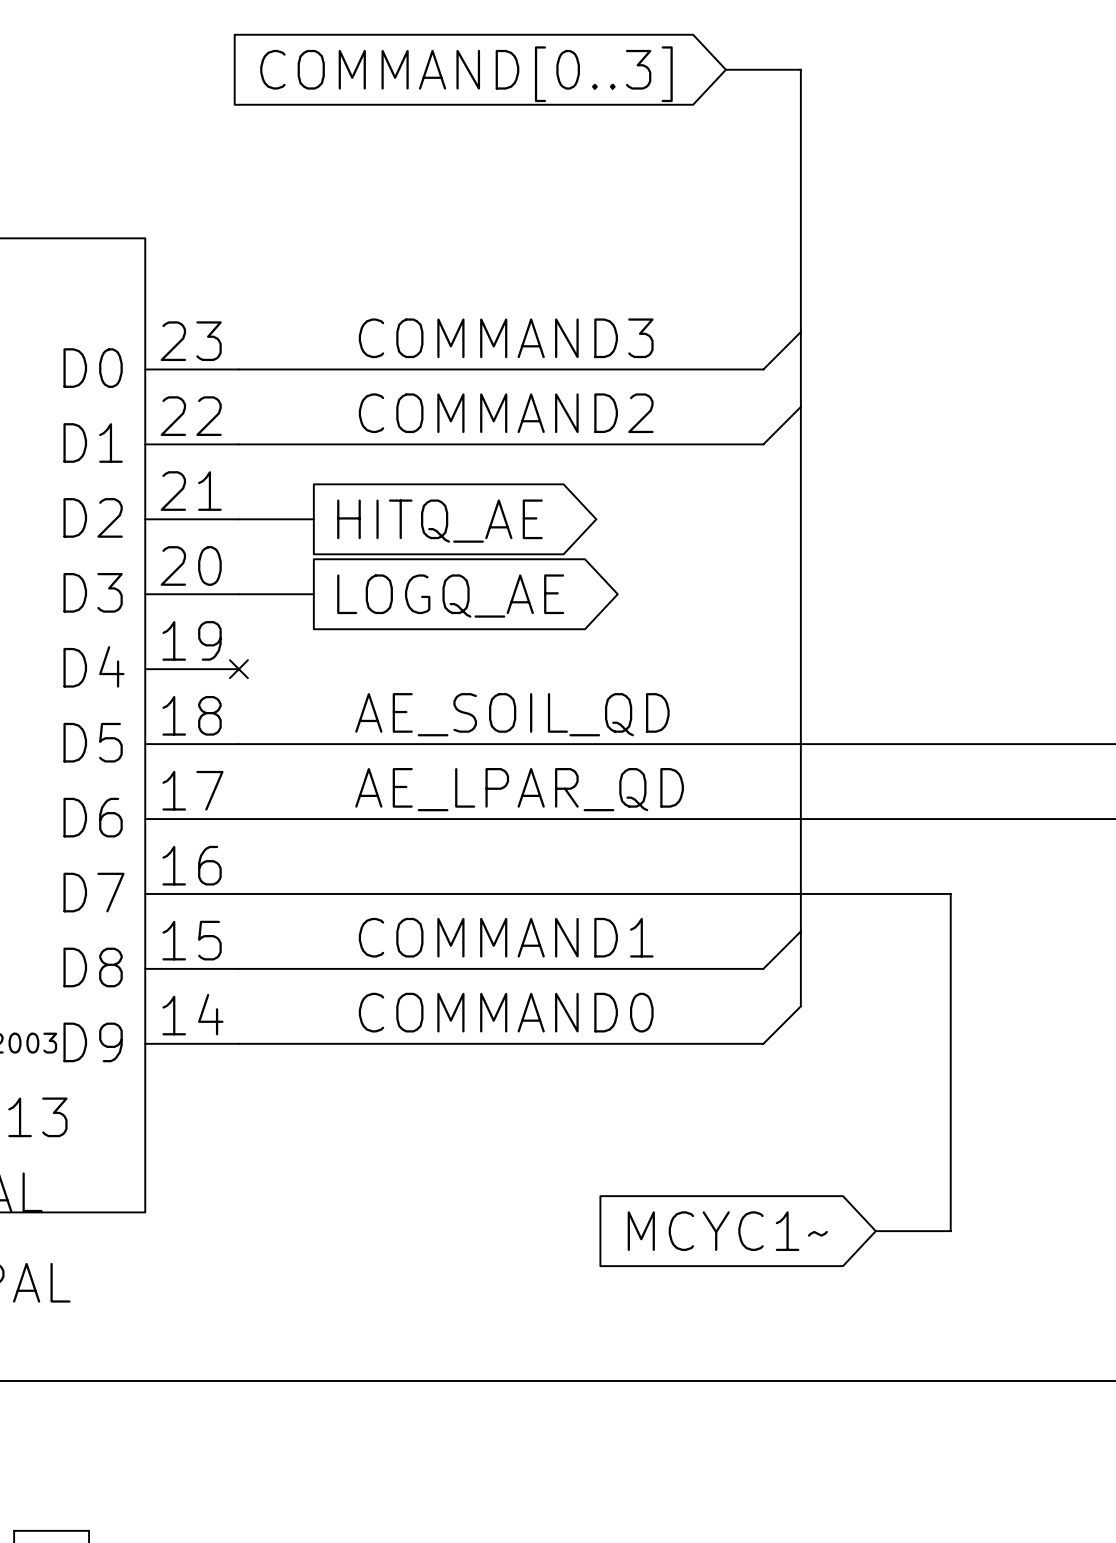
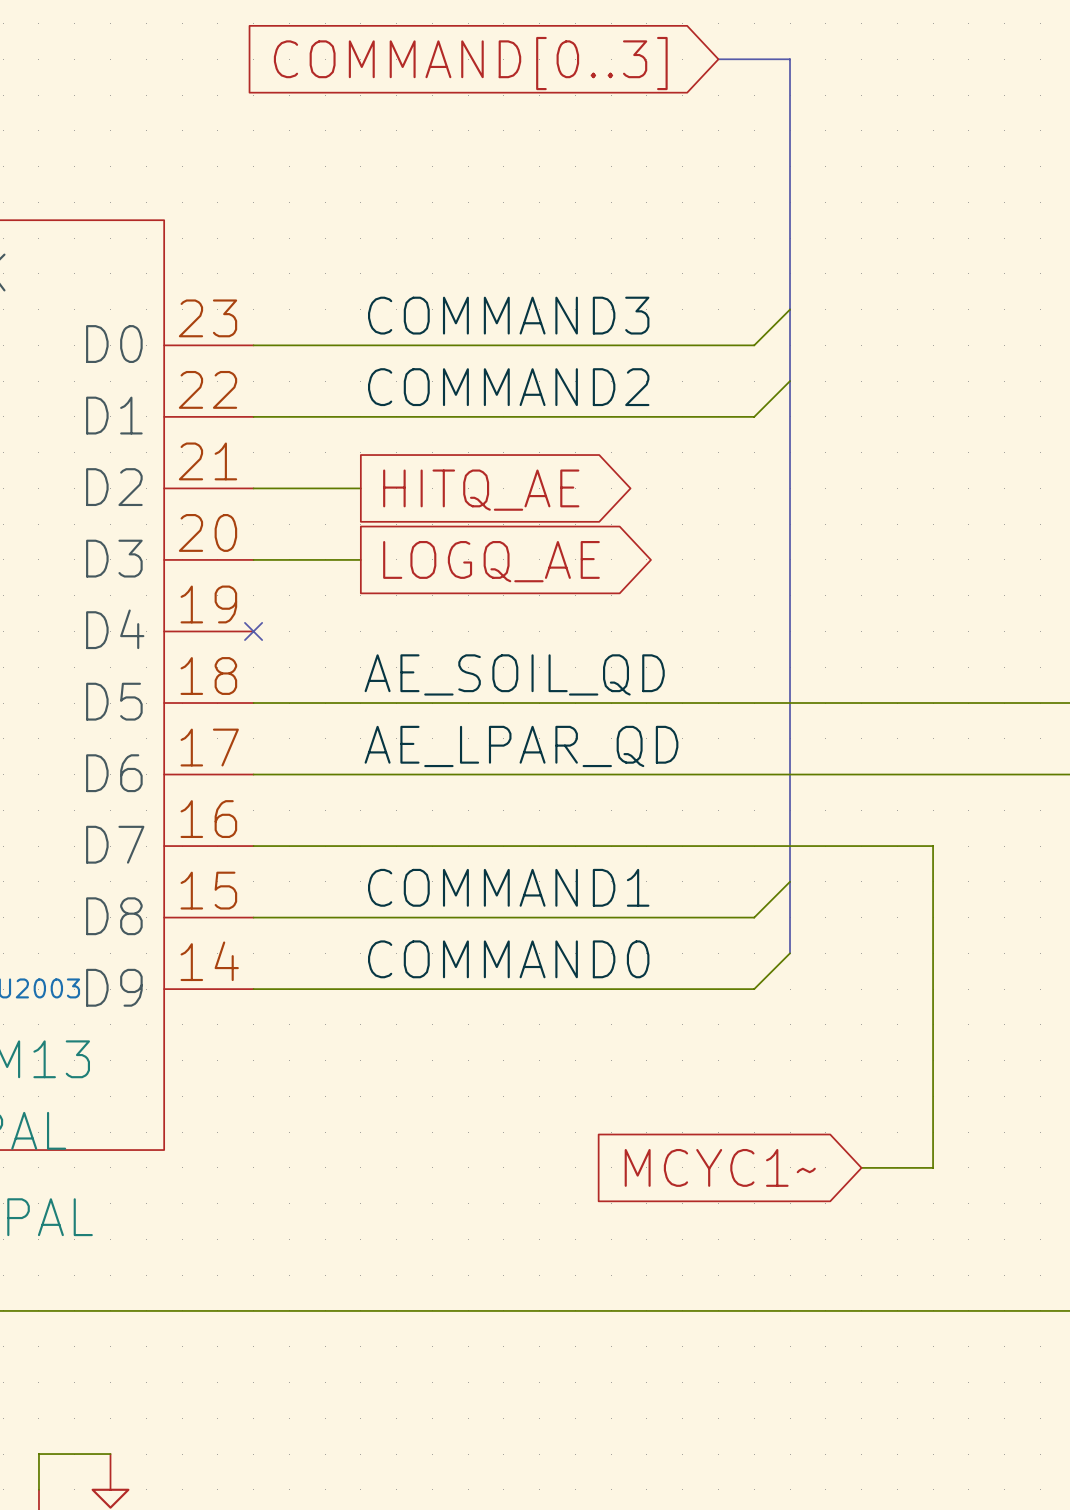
wire: none -> (325, 488) (360, 488)
global label position: HITQ_AE (439, 521) -> HITQ_AE (481, 490)
wire: none -> (325, 559) (360, 559)
global label position: LOGQ_AE (450, 596) -> LOGQ_AE (491, 561)

